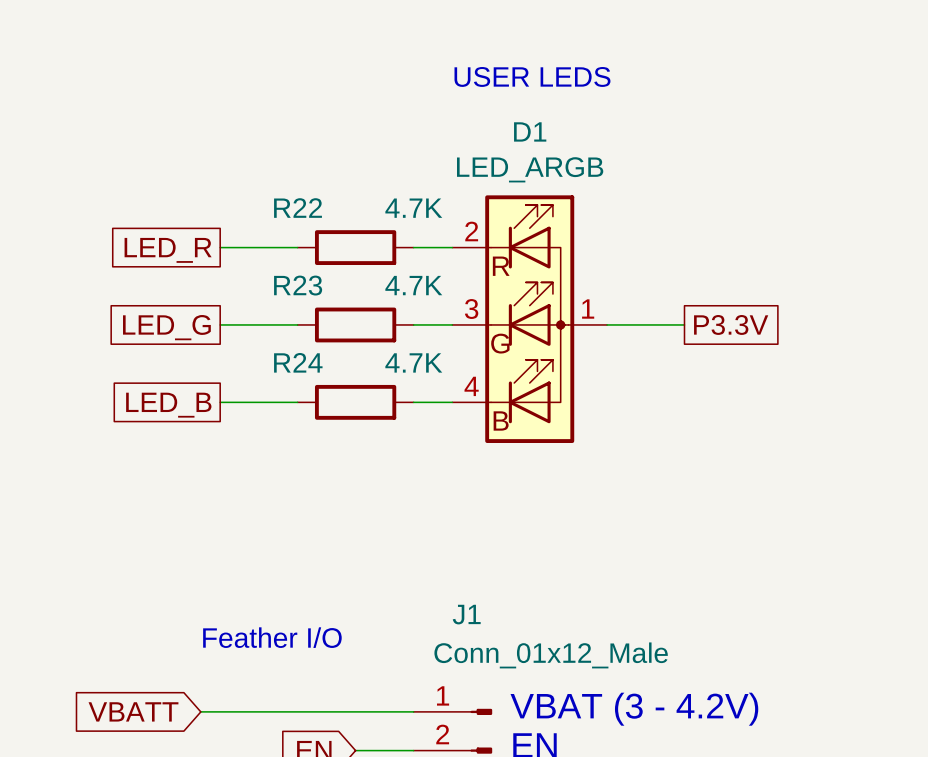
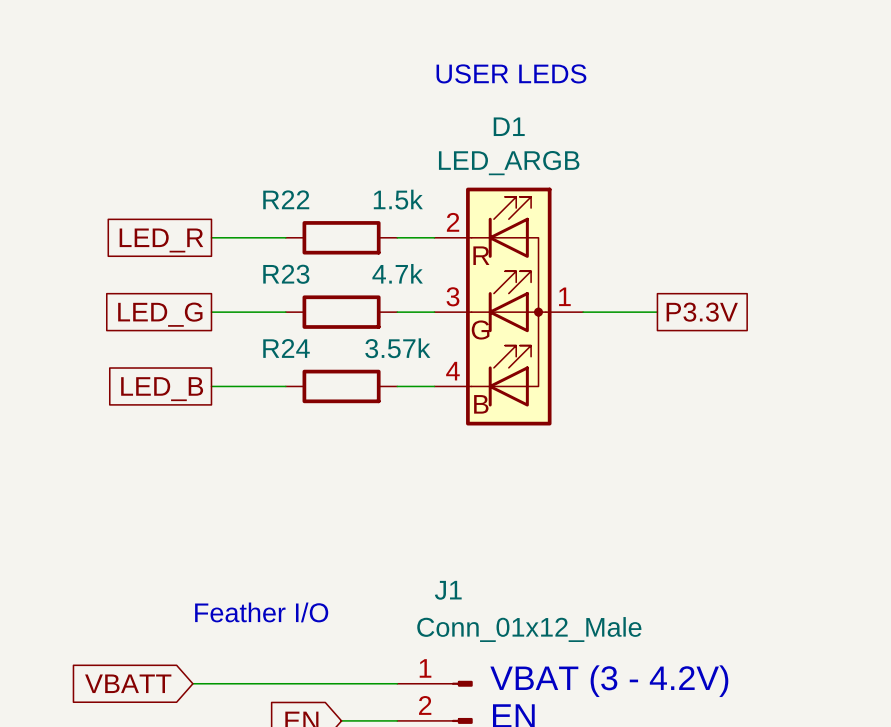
R22 value: 4.7K (413, 208) -> 1.5k (398, 199)
R23 value: 4.7K (413, 285) -> 4.7k (397, 273)
R24 value: 4.7K (413, 362) -> 3.57k (397, 348)

